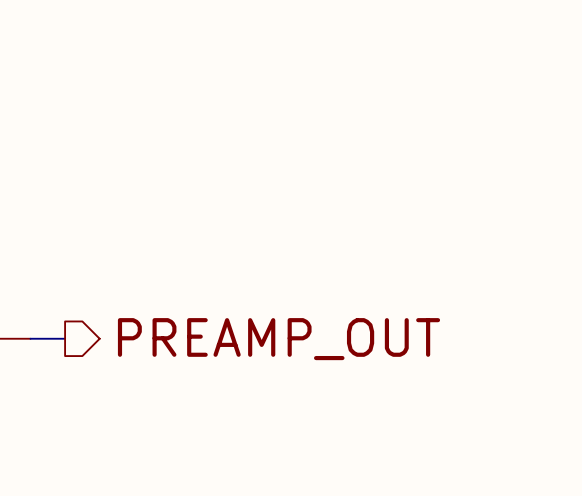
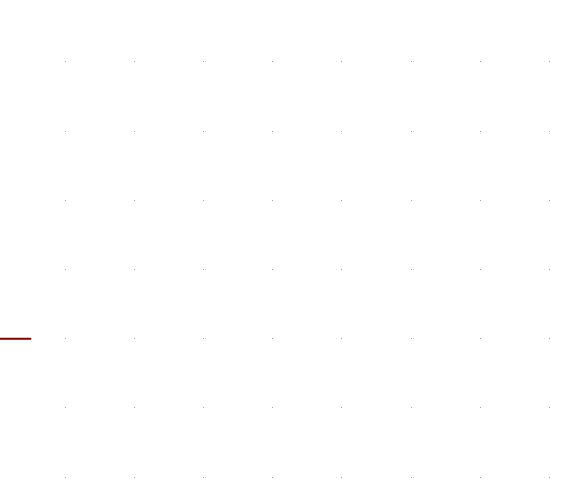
wire: (30, 338) (65, 338) -> none
hierarchical label: PREAMP_OUT (279, 339) -> none

